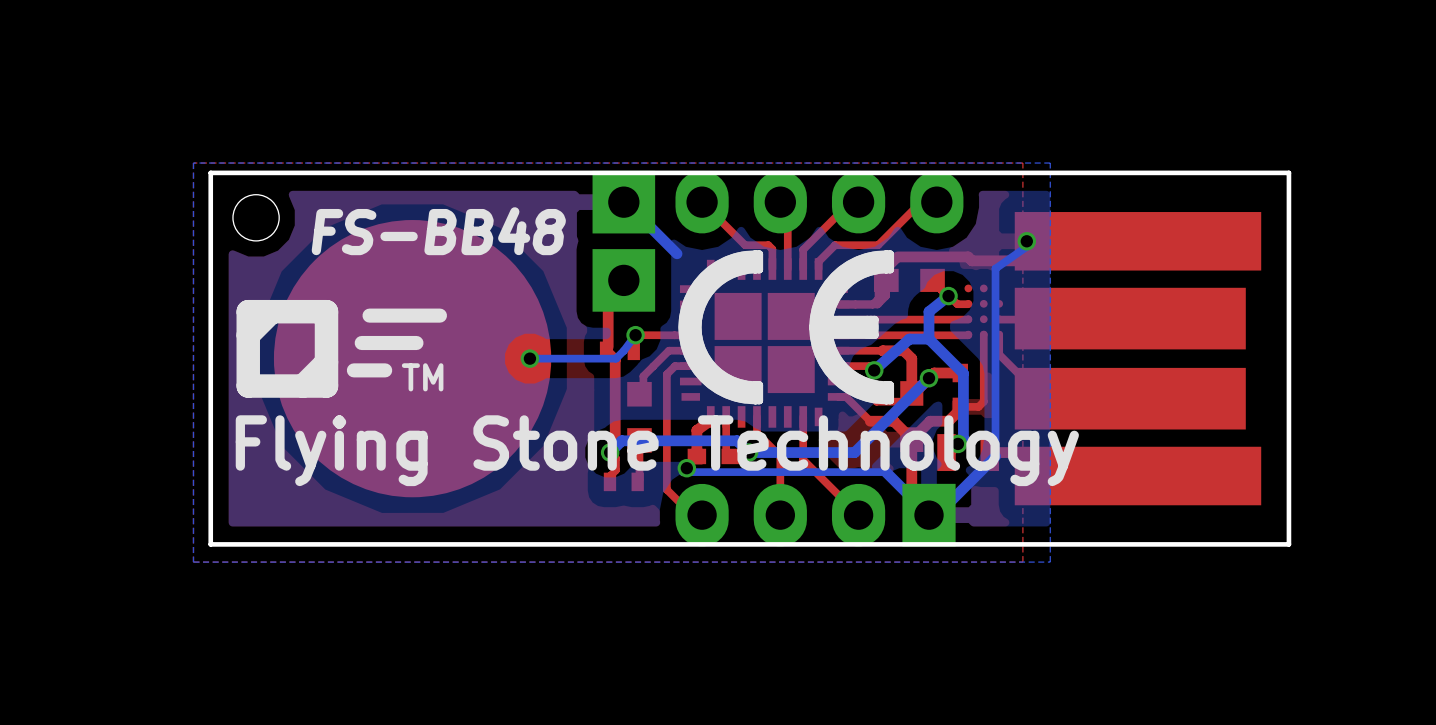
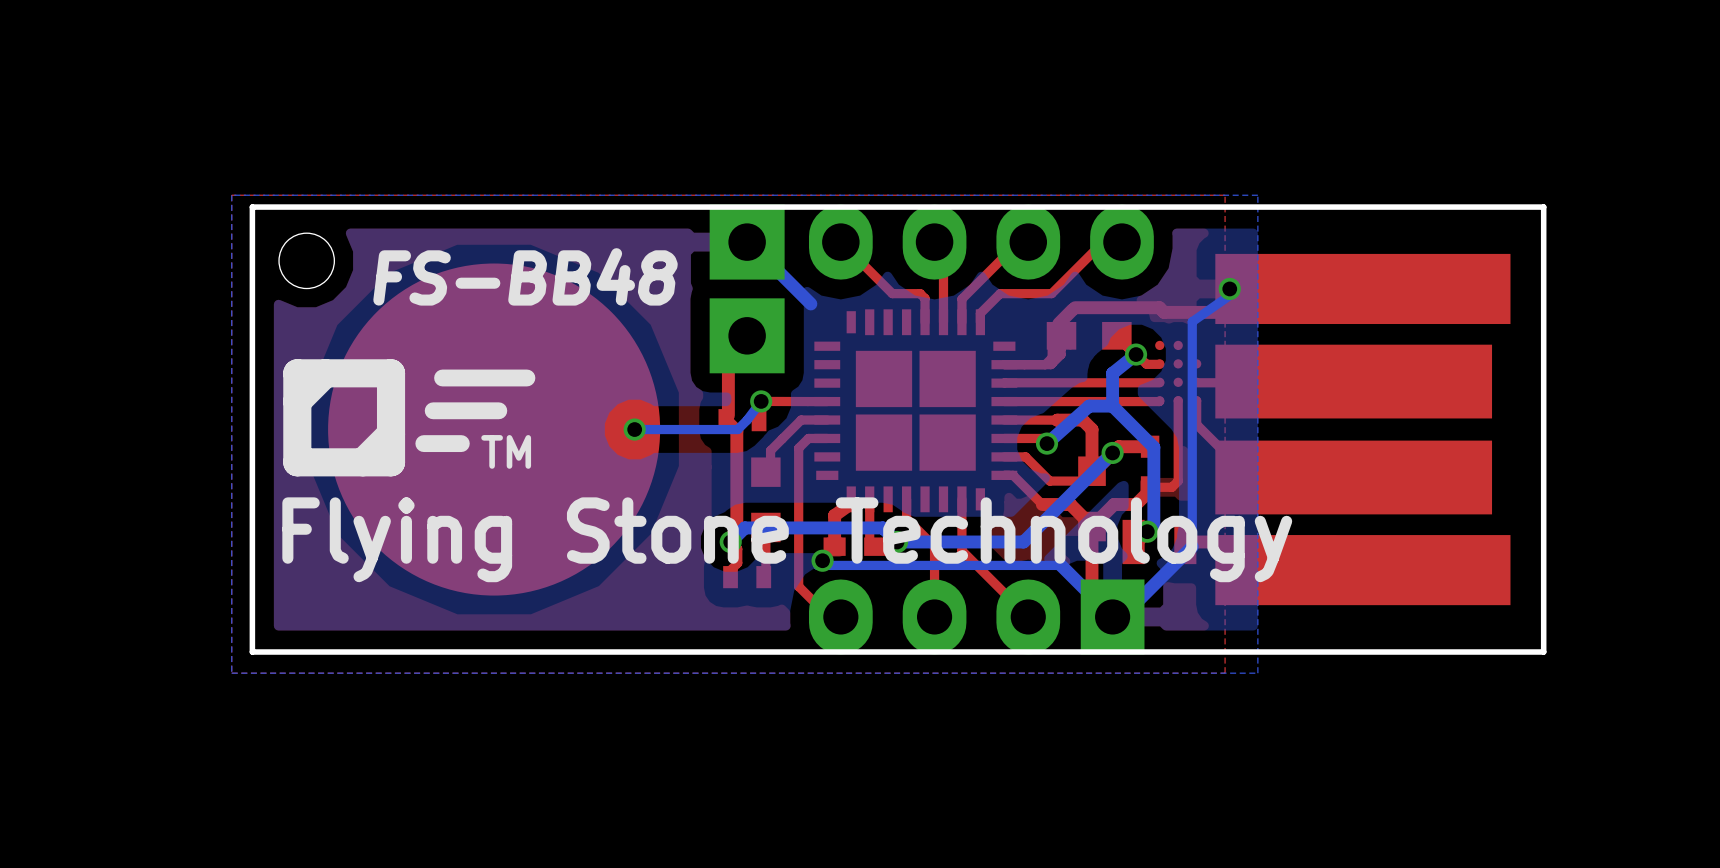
drawing: [678, 250, 895, 405] -> none

